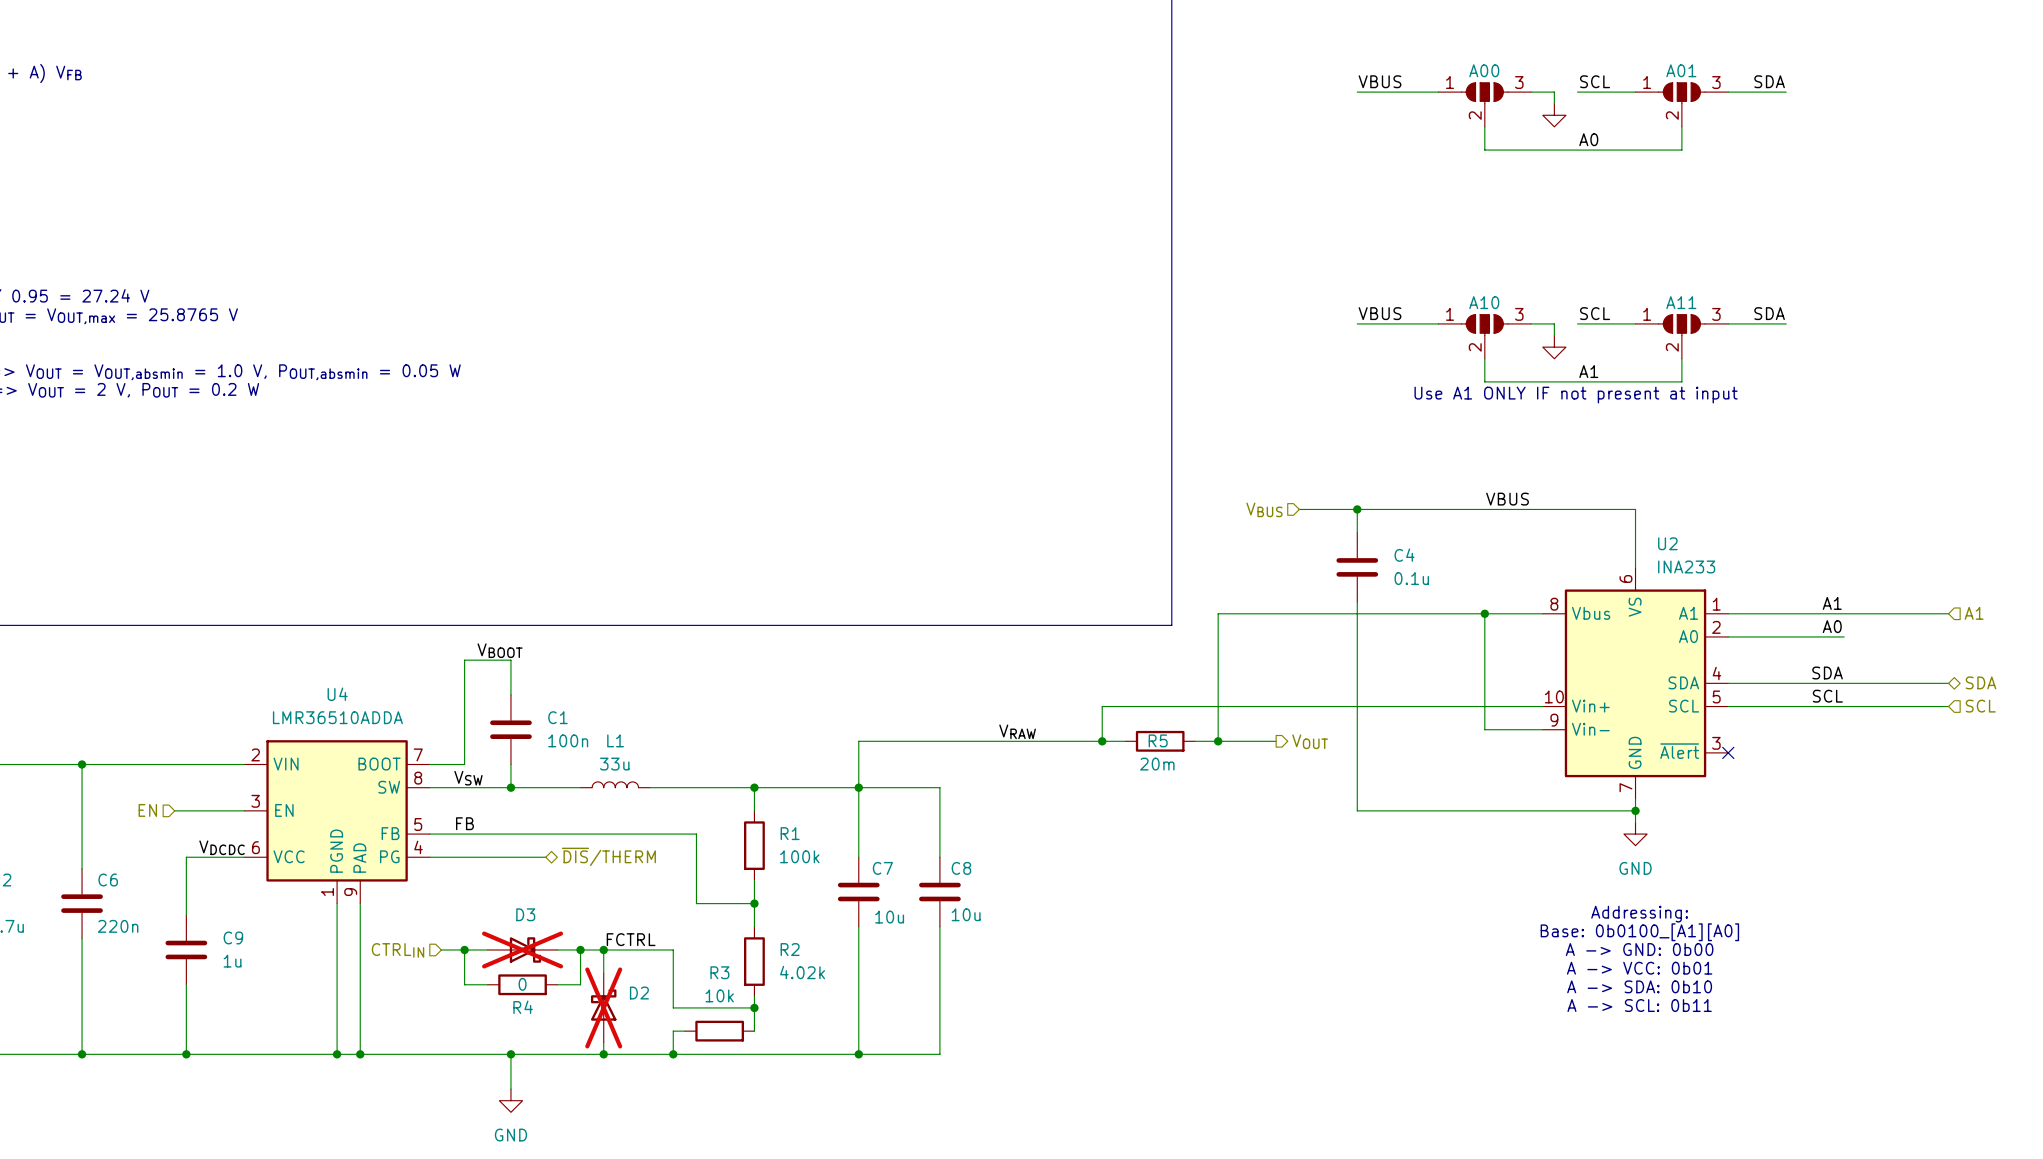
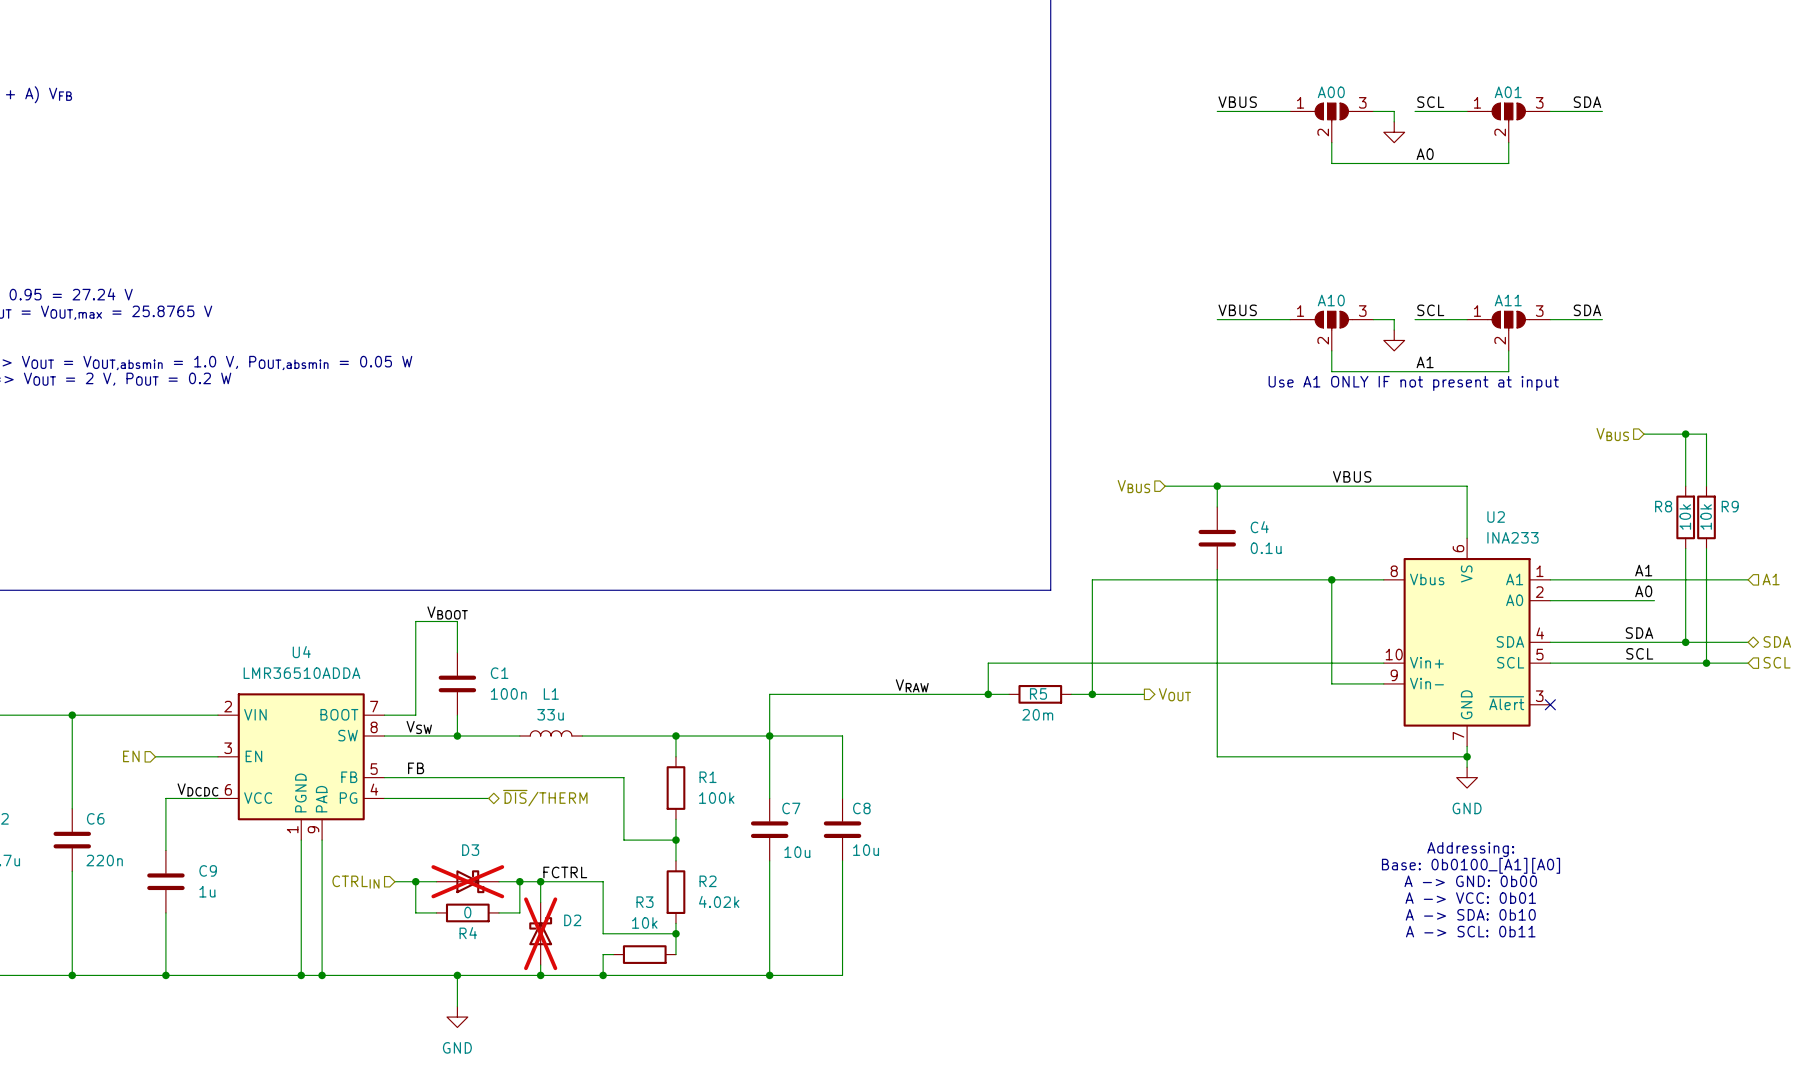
hierarchical label: none -> VBUS (1612, 434)
wire: none -> (1644, 434) (1706, 434) (1706, 486)
wire: none -> (1685, 434) (1685, 486)
junction: none -> (1685, 434)
R8: none -> 10k (1685, 517)
R9: none -> 10k (1706, 517)
wire: none -> (1685, 548) (1685, 642)
wire: none -> (1706, 548) (1706, 663)
junction: none -> (1685, 642)
junction: none -> (1706, 663)

